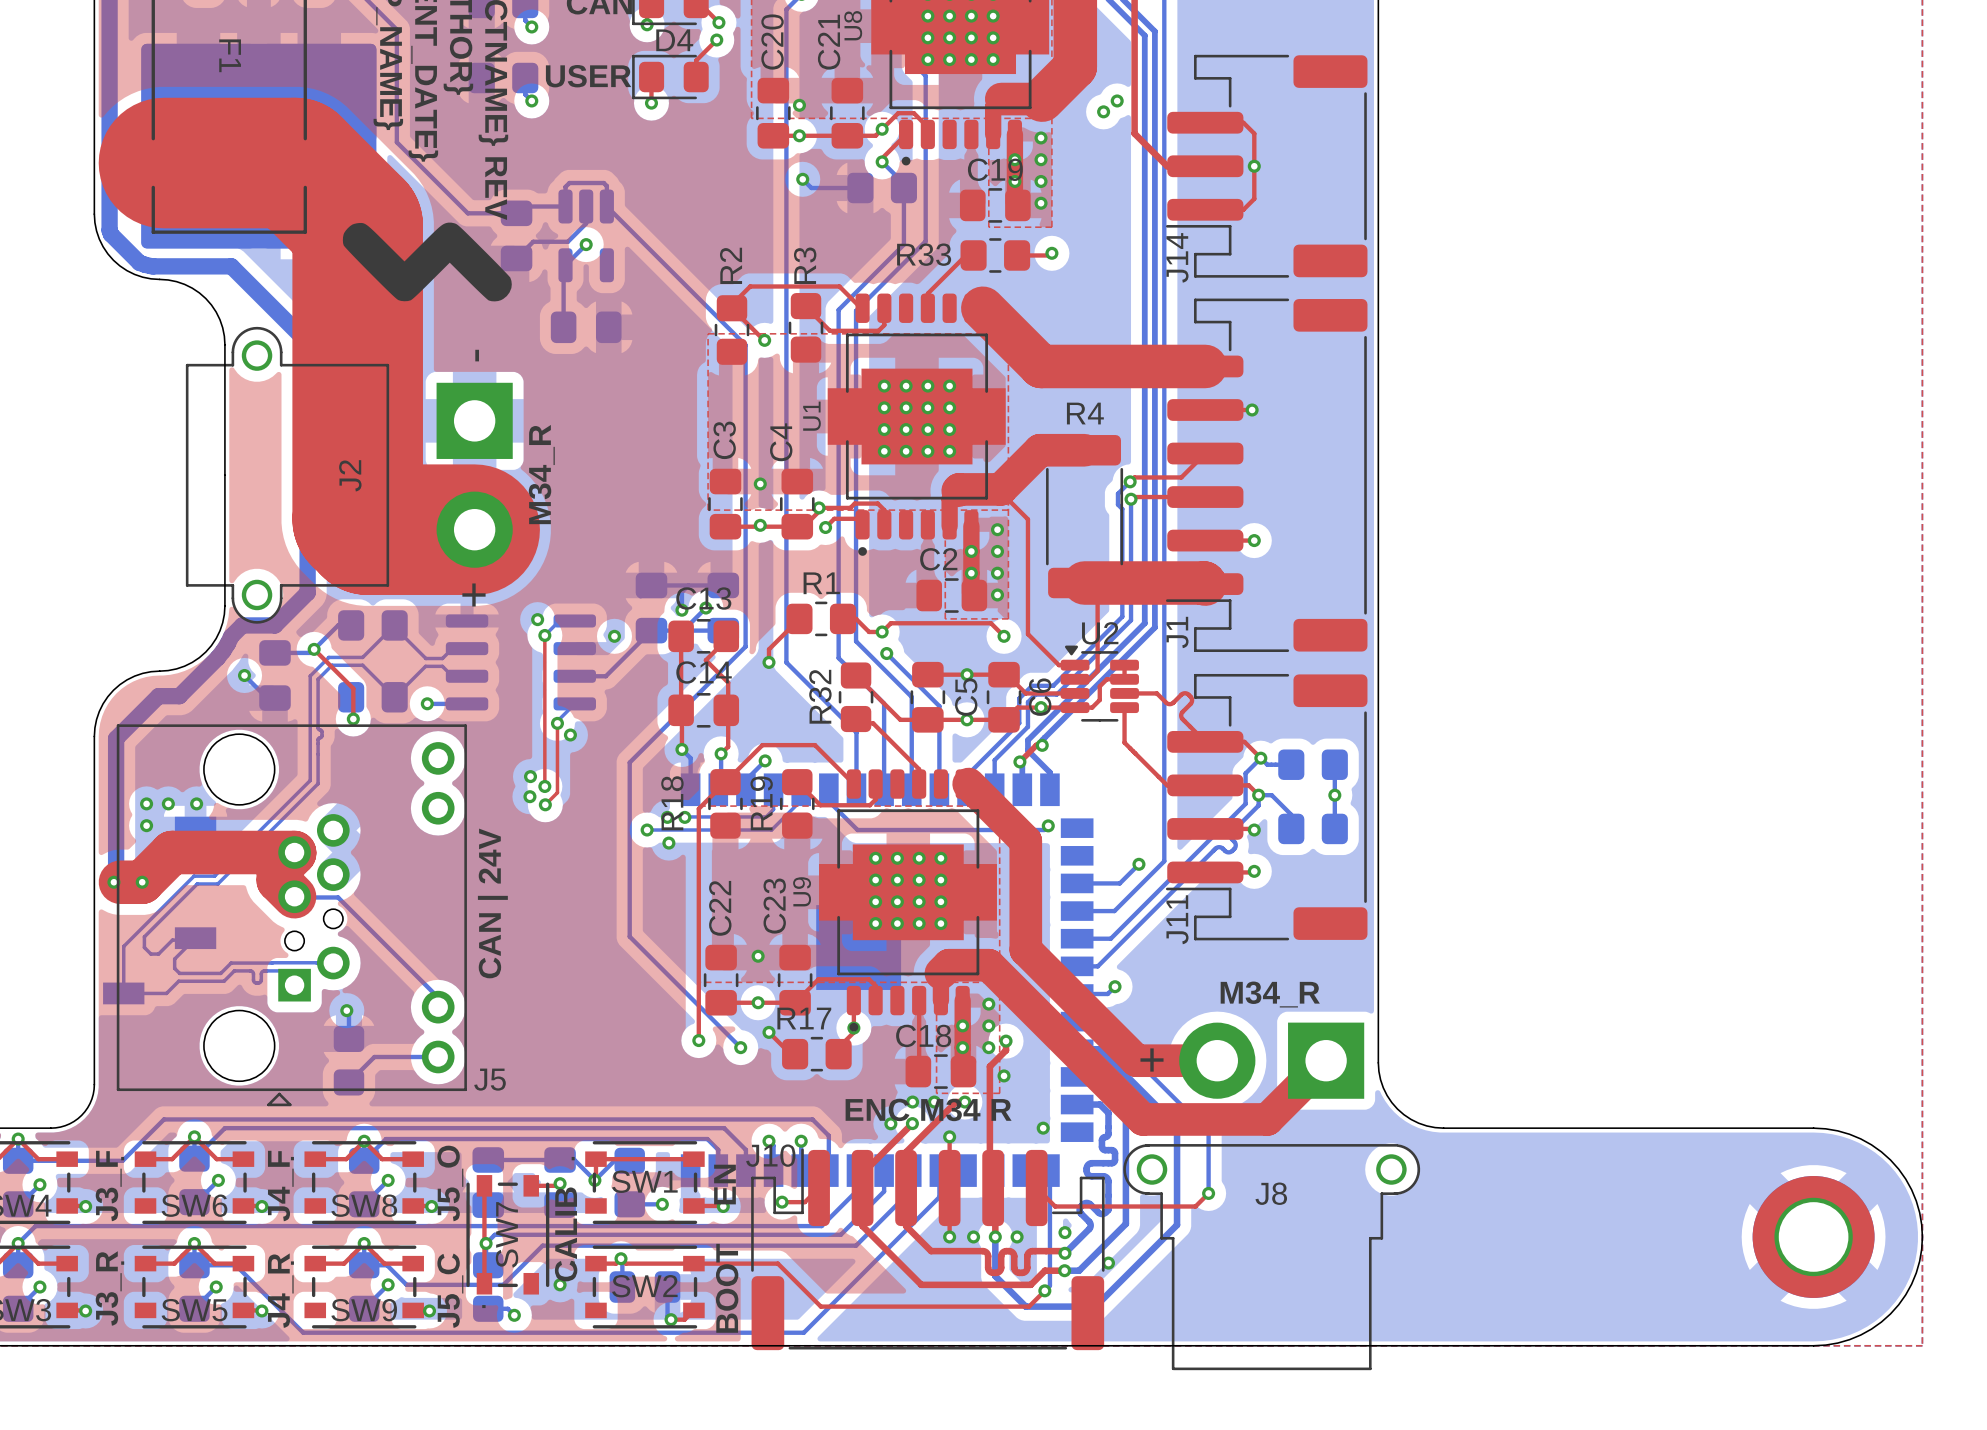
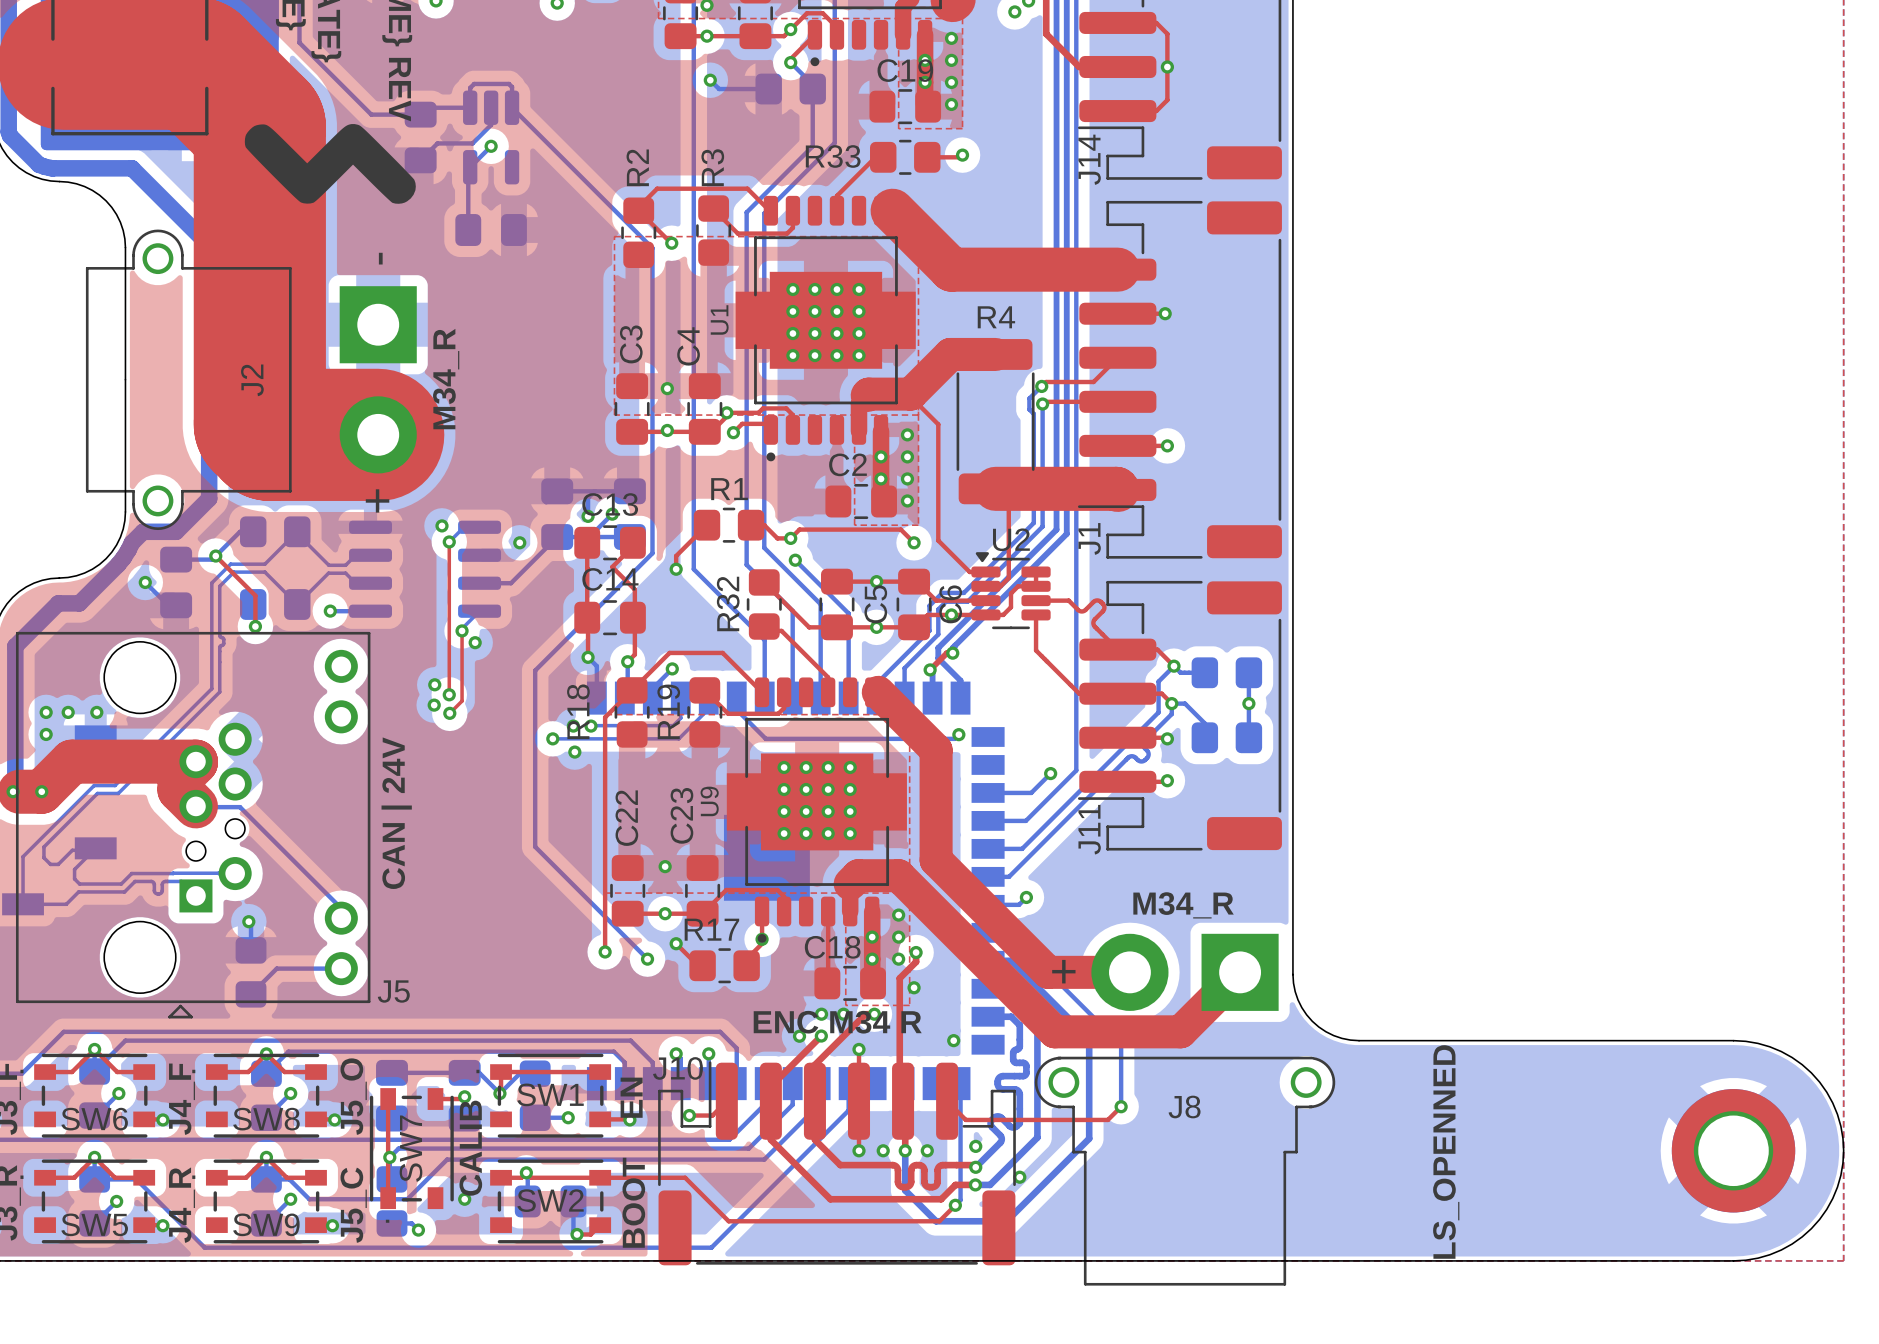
text: none -> LS_OPENNED (1446, 1151)

